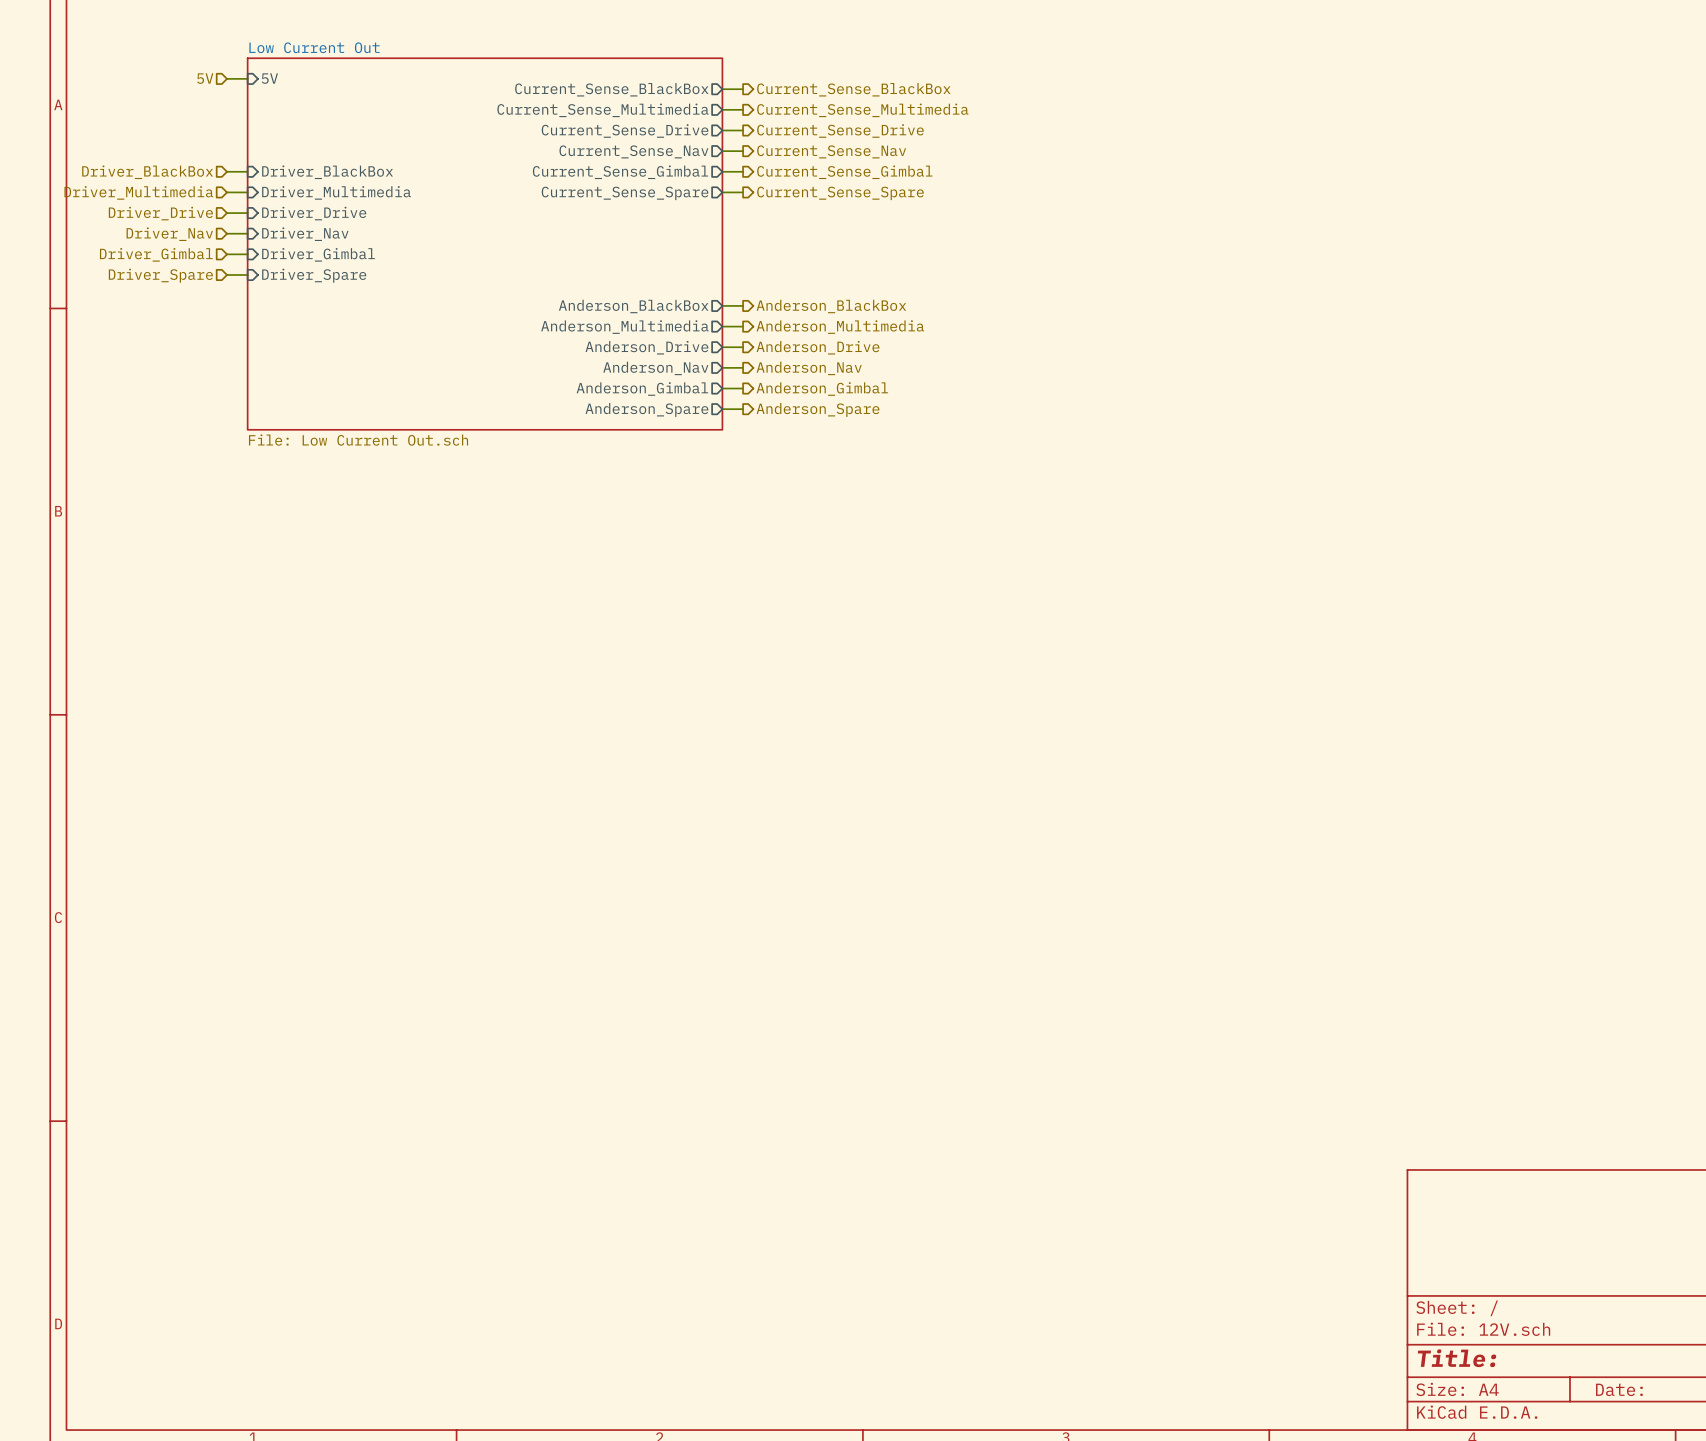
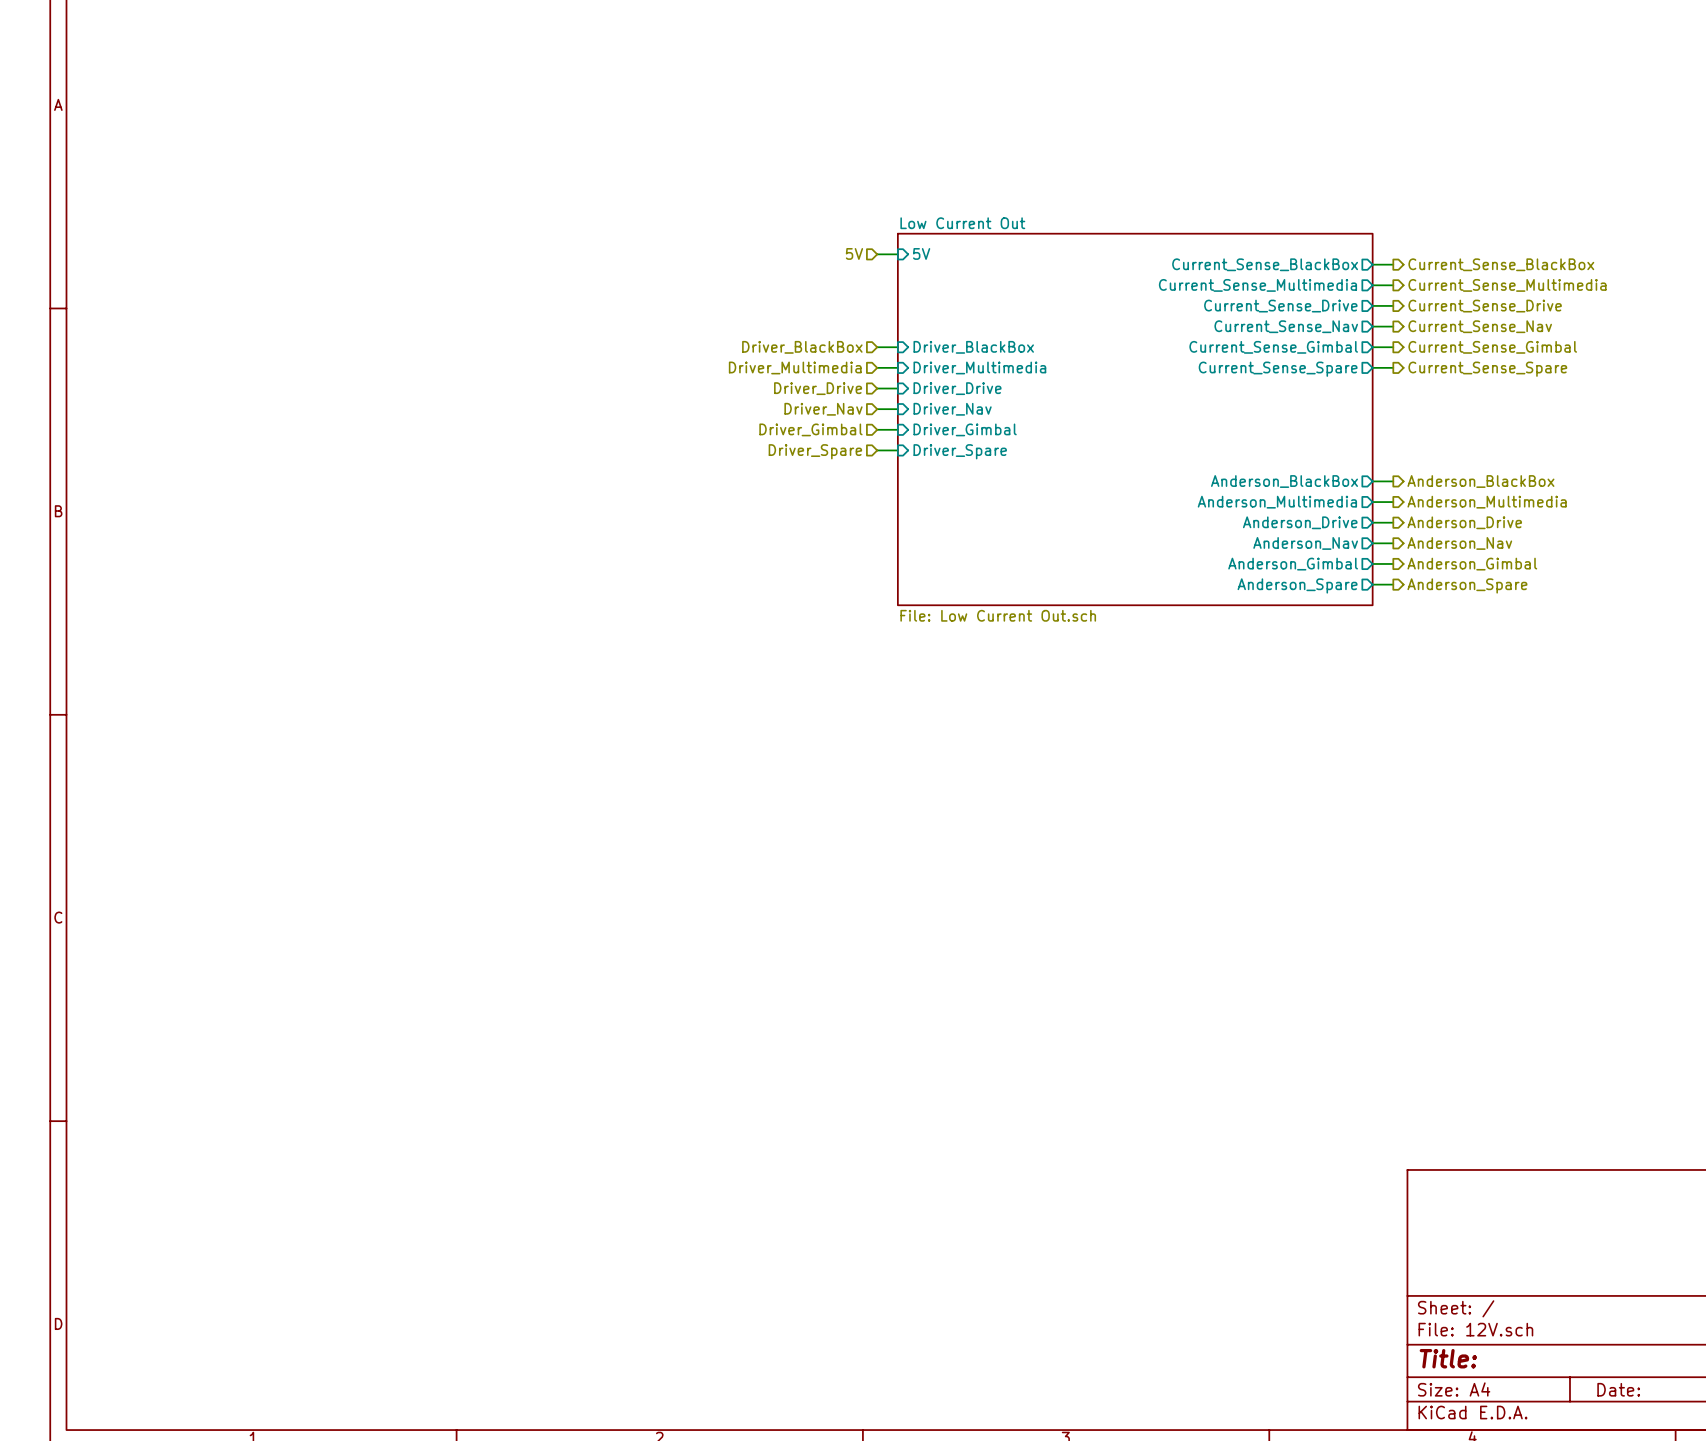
hierarchical label: 5V (205, 78) -> none
wire: (227, 78) (247, 78) -> none
sheet pin: 5V (269, 78) -> none
sheet pin: Current_Sense_BlackBox (611, 89) -> none
wire: (722, 89) (743, 89) -> none
hierarchical label: Current_Sense_BlackBox (853, 89) -> none
wire: (722, 109) (743, 109) -> none
sheet pin: Current_Sense_Multimedia (602, 110) -> none
hierarchical label: Current_Sense_Multimedia (862, 110) -> none
sheet pin: Current_Sense_Drive (625, 130) -> none
wire: (722, 130) (743, 130) -> none
hierarchical label: Current_Sense_Drive (840, 130) -> none
sheet pin: Current_Sense_Nav (633, 151) -> none
wire: (722, 151) (743, 151) -> none
hierarchical label: Current_Sense_Nav (831, 151) -> none
wire: (227, 171) (247, 171) -> none
wire: (722, 171) (743, 171) -> none
hierarchical label: Driver_BlackBox (147, 172) -> none
sheet pin: Driver_BlackBox (327, 172) -> none
sheet pin: Current_Sense_Gimbal (620, 172) -> none
hierarchical label: Current_Sense_Gimbal (844, 172) -> none
hierarchical label: Driver_Multimedia (138, 192) -> none
wire: (227, 192) (247, 192) -> none
sheet pin: Driver_Multimedia (336, 192) -> none
wire: (722, 192) (743, 192) -> (877, 254) (897, 254)
sheet pin: Current_Sense_Spare (625, 193) -> none
hierarchical label: Current_Sense_Spare (840, 193) -> none
hierarchical label: Driver_Drive (160, 213) -> none
wire: (227, 213) (247, 213) -> none
sheet pin: Driver_Drive (314, 213) -> none
wire: (227, 233) (247, 233) -> none
hierarchical label: Driver_Nav (169, 234) -> none
sheet pin: Driver_Nav (305, 234) -> none
sheet Low Current Out: File: Low Current Out.sch (485, 244) -> none
hierarchical label: Driver_Gimbal (156, 254) -> none
wire: (227, 254) (247, 254) -> none
sheet pin: Driver_Gimbal (318, 254) -> none
hierarchical label: none -> 5V (854, 253)
sheet pin: none -> 5V (921, 253)
wire: none -> (1372, 264) (1393, 264)
sheet pin: none -> Current_Sense_BlackBox (1265, 264)
hierarchical label: none -> Current_Sense_BlackBox (1501, 264)
wire: (227, 274) (247, 274) -> none
hierarchical label: Driver_Spare (160, 275) -> none
sheet pin: Driver_Spare (314, 275) -> none
sheet pin: none -> Current_Sense_Multimedia (1257, 285)
wire: none -> (1372, 285) (1393, 285)
hierarchical label: none -> Current_Sense_Multimedia (1507, 285)
wire: (722, 305) (743, 305) -> (877, 347) (897, 347)
wire: none -> (1372, 305) (1393, 305)
sheet pin: Anderson_BlackBox (633, 306) -> none
hierarchical label: Anderson_BlackBox (831, 306) -> none
sheet pin: none -> Current_Sense_Drive (1280, 306)
hierarchical label: none -> Current_Sense_Drive (1485, 306)
wire: (722, 326) (743, 326) -> (877, 367) (897, 367)
wire: none -> (1372, 326) (1393, 326)
sheet pin: Anderson_Multimedia (624, 327) -> none
hierarchical label: Anderson_Multimedia (840, 327) -> none
sheet pin: none -> Current_Sense_Nav (1286, 326)
hierarchical label: none -> Current_Sense_Nav (1480, 326)
sheet pin: Anderson_Drive (646, 347) -> none
wire: (722, 347) (743, 347) -> (877, 388) (897, 388)
hierarchical label: none -> Driver_BlackBox (802, 347)
hierarchical label: Anderson_Drive (818, 347) -> none
sheet pin: none -> Driver_BlackBox (973, 347)
sheet pin: none -> Current_Sense_Gimbal (1273, 347)
wire: none -> (1372, 347) (1393, 347)
hierarchical label: none -> Current_Sense_Gimbal (1492, 347)
wire: (722, 367) (743, 367) -> (877, 409) (897, 409)
wire: none -> (1372, 367) (1393, 367)
sheet pin: Anderson_Nav (655, 368) -> none
hierarchical label: none -> Driver_Multimedia (795, 367)
hierarchical label: Anderson_Nav (809, 368) -> none
sheet pin: none -> Driver_Multimedia (979, 367)
sheet pin: none -> Current_Sense_Spare (1278, 369)
hierarchical label: none -> Current_Sense_Spare (1487, 369)
wire: (722, 388) (743, 388) -> (877, 429) (897, 429)
sheet pin: Anderson_Gimbal (642, 389) -> none
hierarchical label: none -> Driver_Drive (818, 388)
hierarchical label: Anderson_Gimbal (822, 389) -> none
sheet pin: none -> Driver_Drive (957, 388)
sheet pin: Anderson_Spare (646, 409) -> none
wire: (722, 409) (743, 409) -> (877, 450) (897, 450)
hierarchical label: Anderson_Spare (818, 409) -> none
hierarchical label: none -> Driver_Nav (823, 409)
sheet pin: none -> Driver_Nav (952, 409)
sheet Low Current Out: none -> File: Low Current Out.sch (1135, 419)
hierarchical label: none -> Driver_Gimbal (810, 429)
sheet pin: none -> Driver_Gimbal (965, 429)
hierarchical label: none -> Driver_Spare (815, 451)
sheet pin: none -> Driver_Spare (960, 451)
sheet pin: none -> Anderson_BlackBox (1284, 481)
wire: none -> (1372, 481) (1393, 481)
hierarchical label: none -> Anderson_BlackBox (1480, 481)
sheet pin: none -> Anderson_Multimedia (1277, 502)
wire: none -> (1372, 502) (1393, 502)
hierarchical label: none -> Anderson_Multimedia (1487, 502)
wire: none -> (1372, 522) (1393, 522)
sheet pin: none -> Anderson_Drive (1300, 522)
hierarchical label: none -> Anderson_Drive (1464, 522)
sheet pin: none -> Anderson_Nav (1305, 543)
wire: none -> (1372, 543) (1393, 543)
hierarchical label: none -> Anderson_Nav (1459, 543)
wire: none -> (1372, 563) (1393, 563)
sheet pin: none -> Anderson_Gimbal (1293, 564)
hierarchical label: none -> Anderson_Gimbal (1472, 564)
wire: none -> (1372, 584) (1393, 584)
sheet pin: none -> Anderson_Spare (1297, 585)
hierarchical label: none -> Anderson_Spare (1467, 585)

